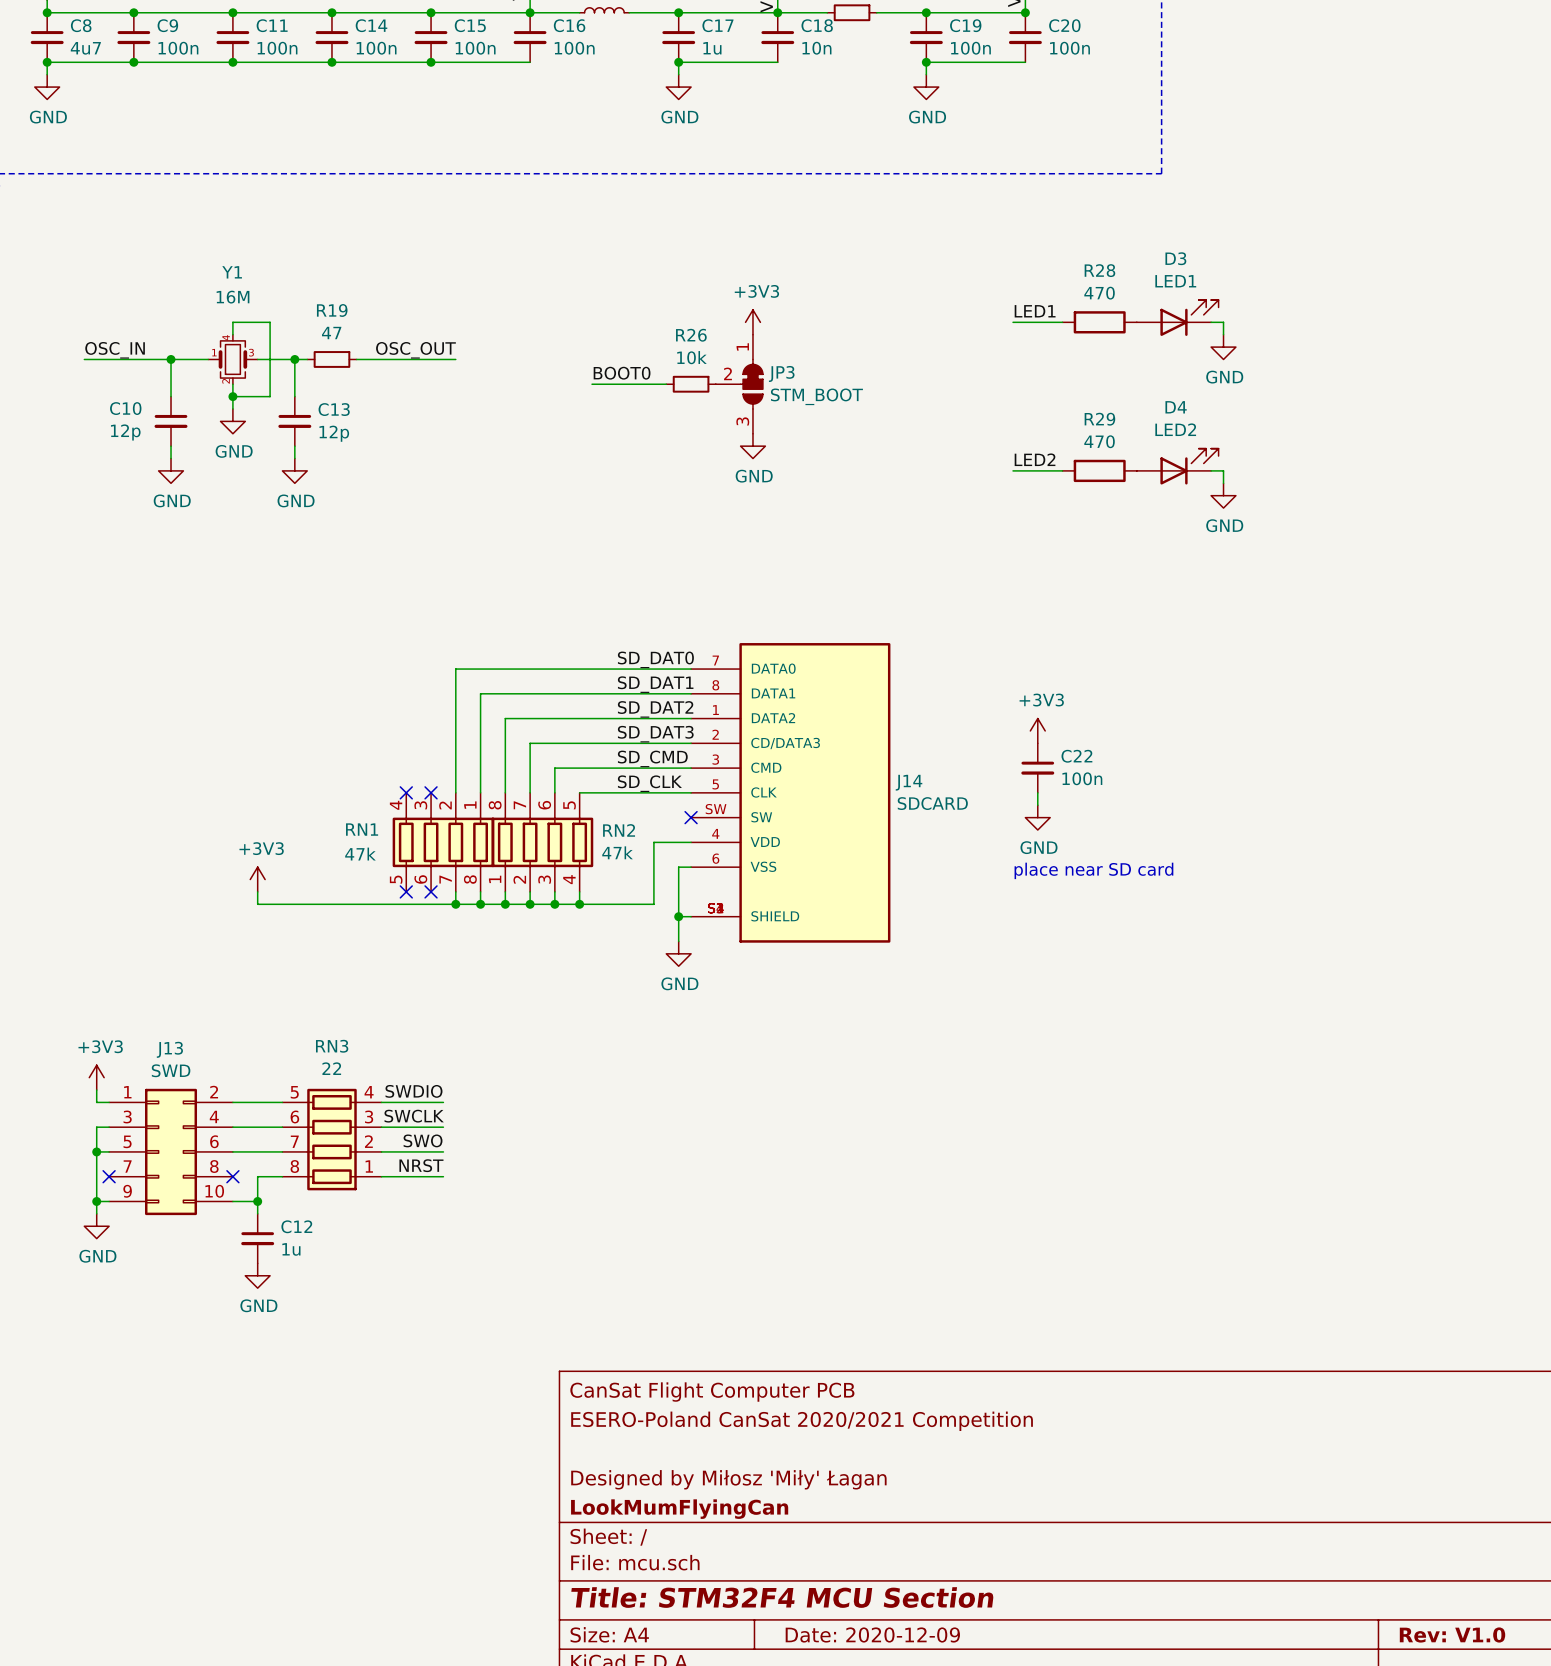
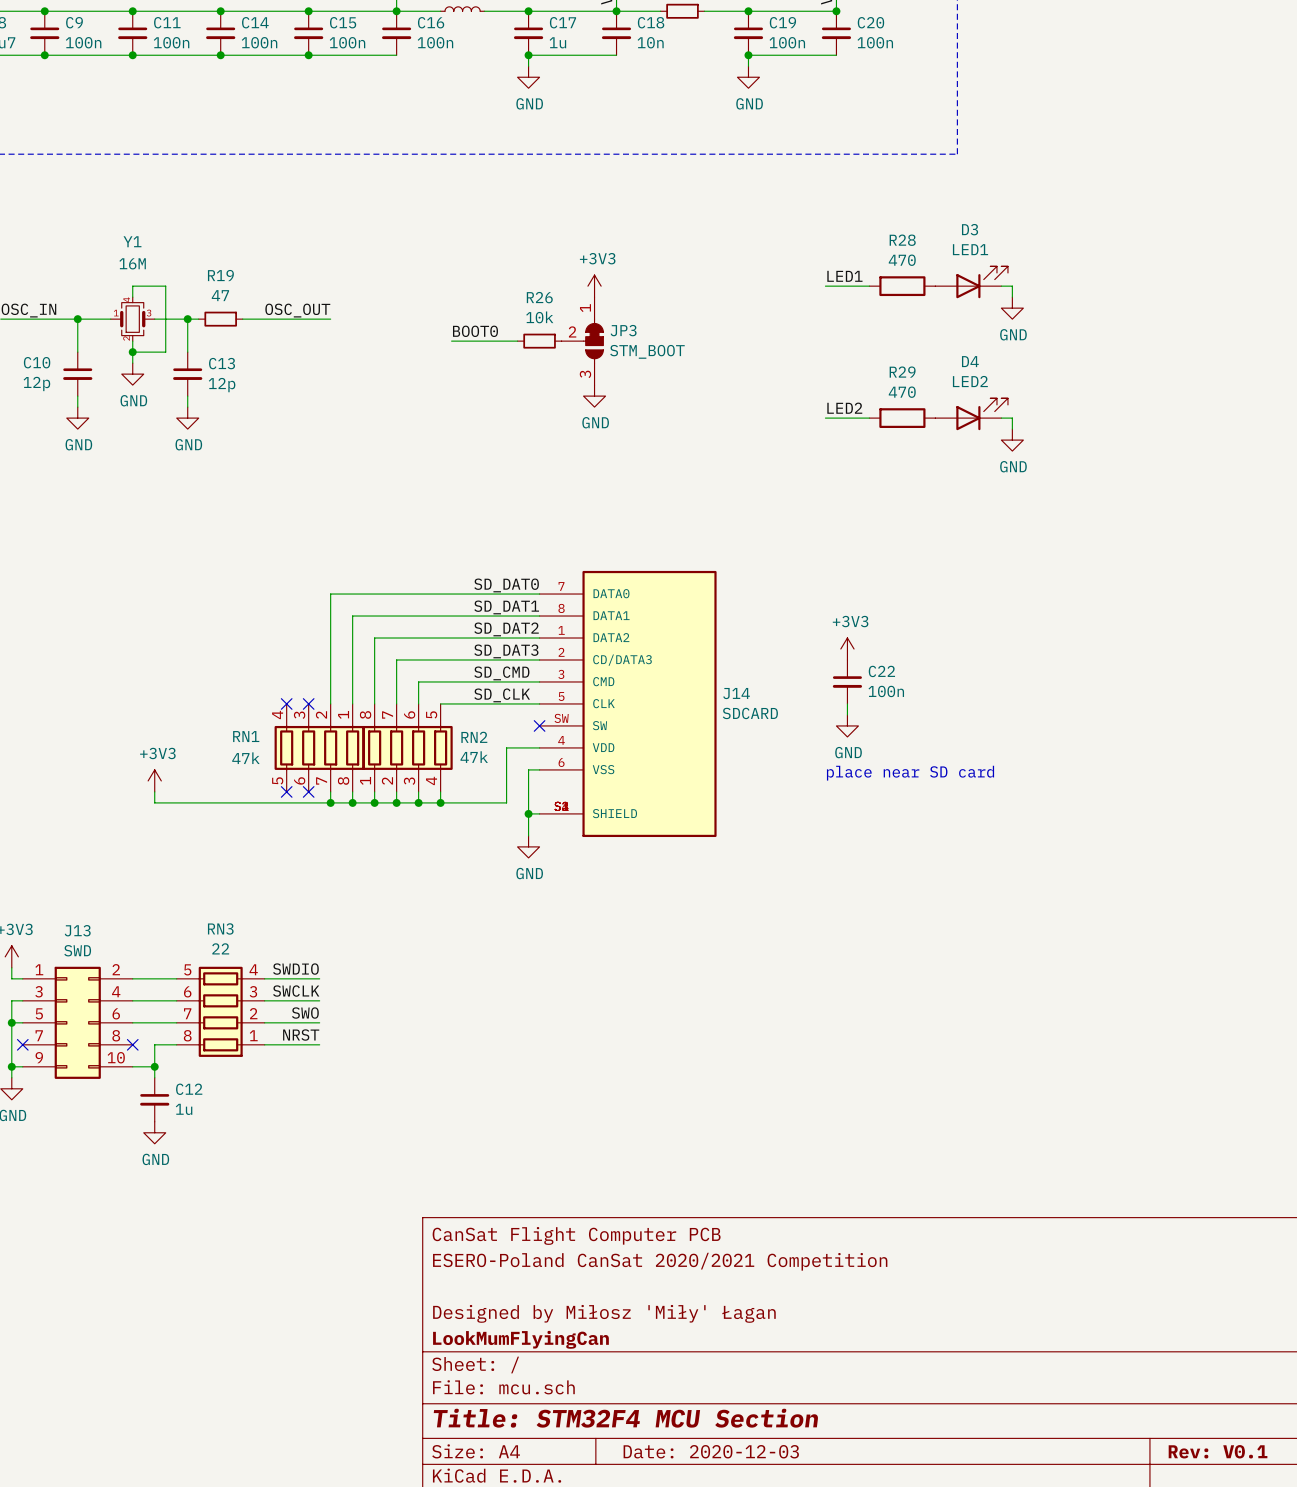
title block: Date: 2020-12-09 (872, 1634) -> Date: 2020-12-03 (711, 1451)
title block: Rev: V1.0 (1452, 1634) -> Rev: V0.1 (1218, 1451)

